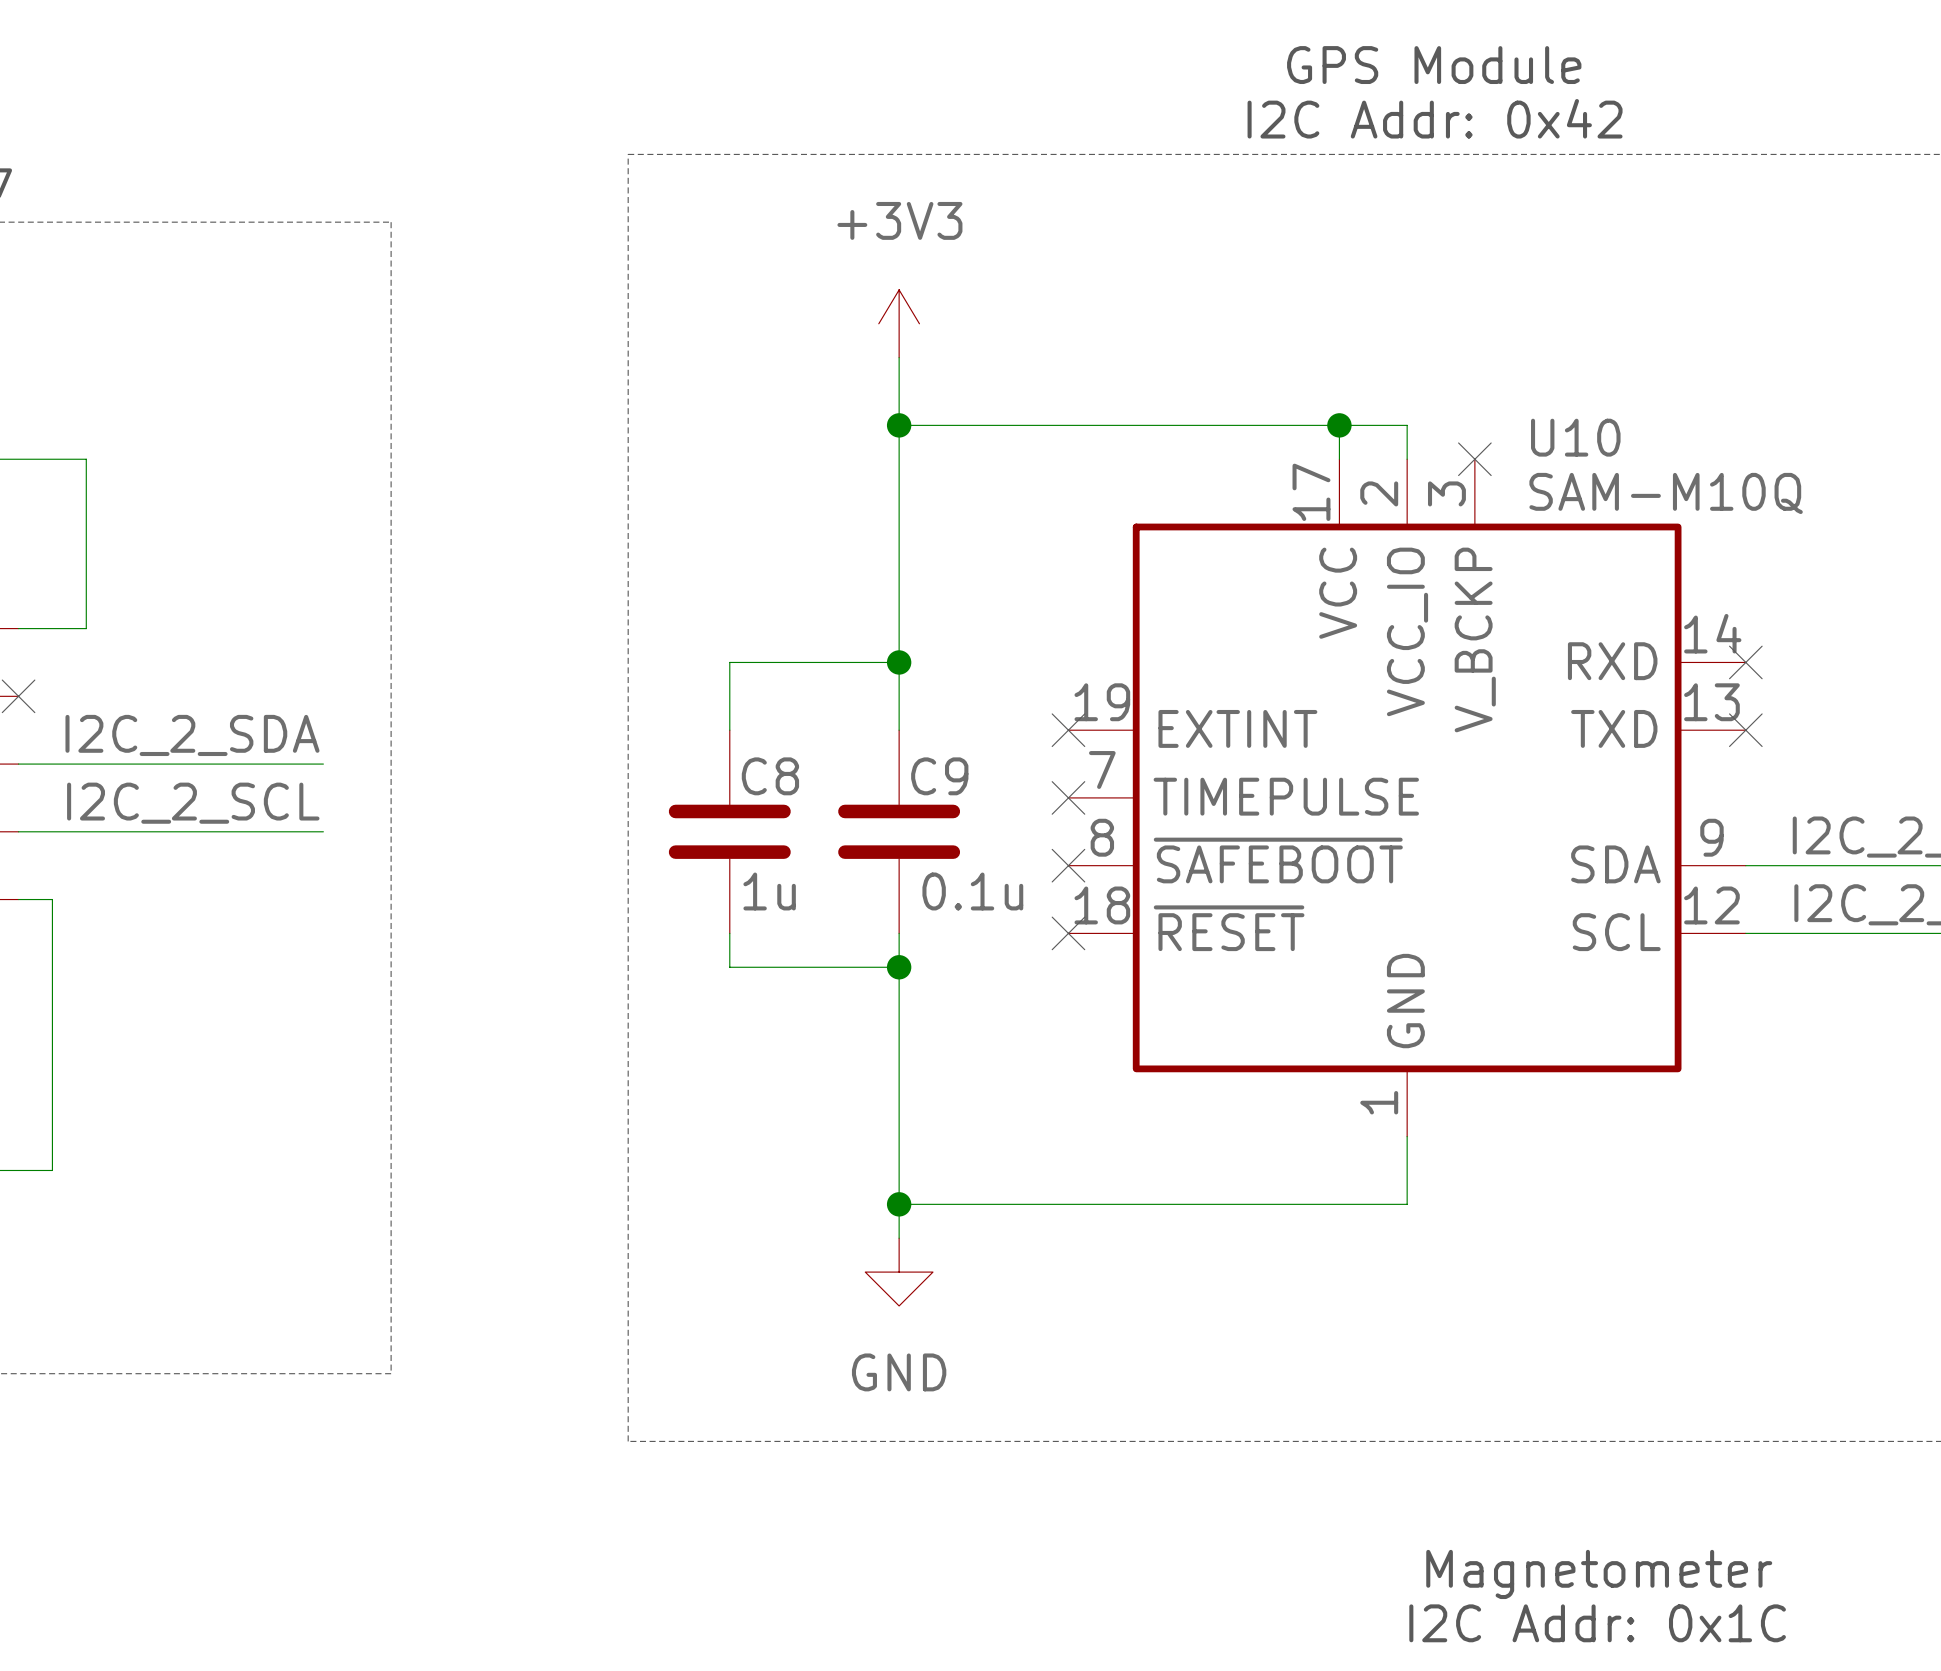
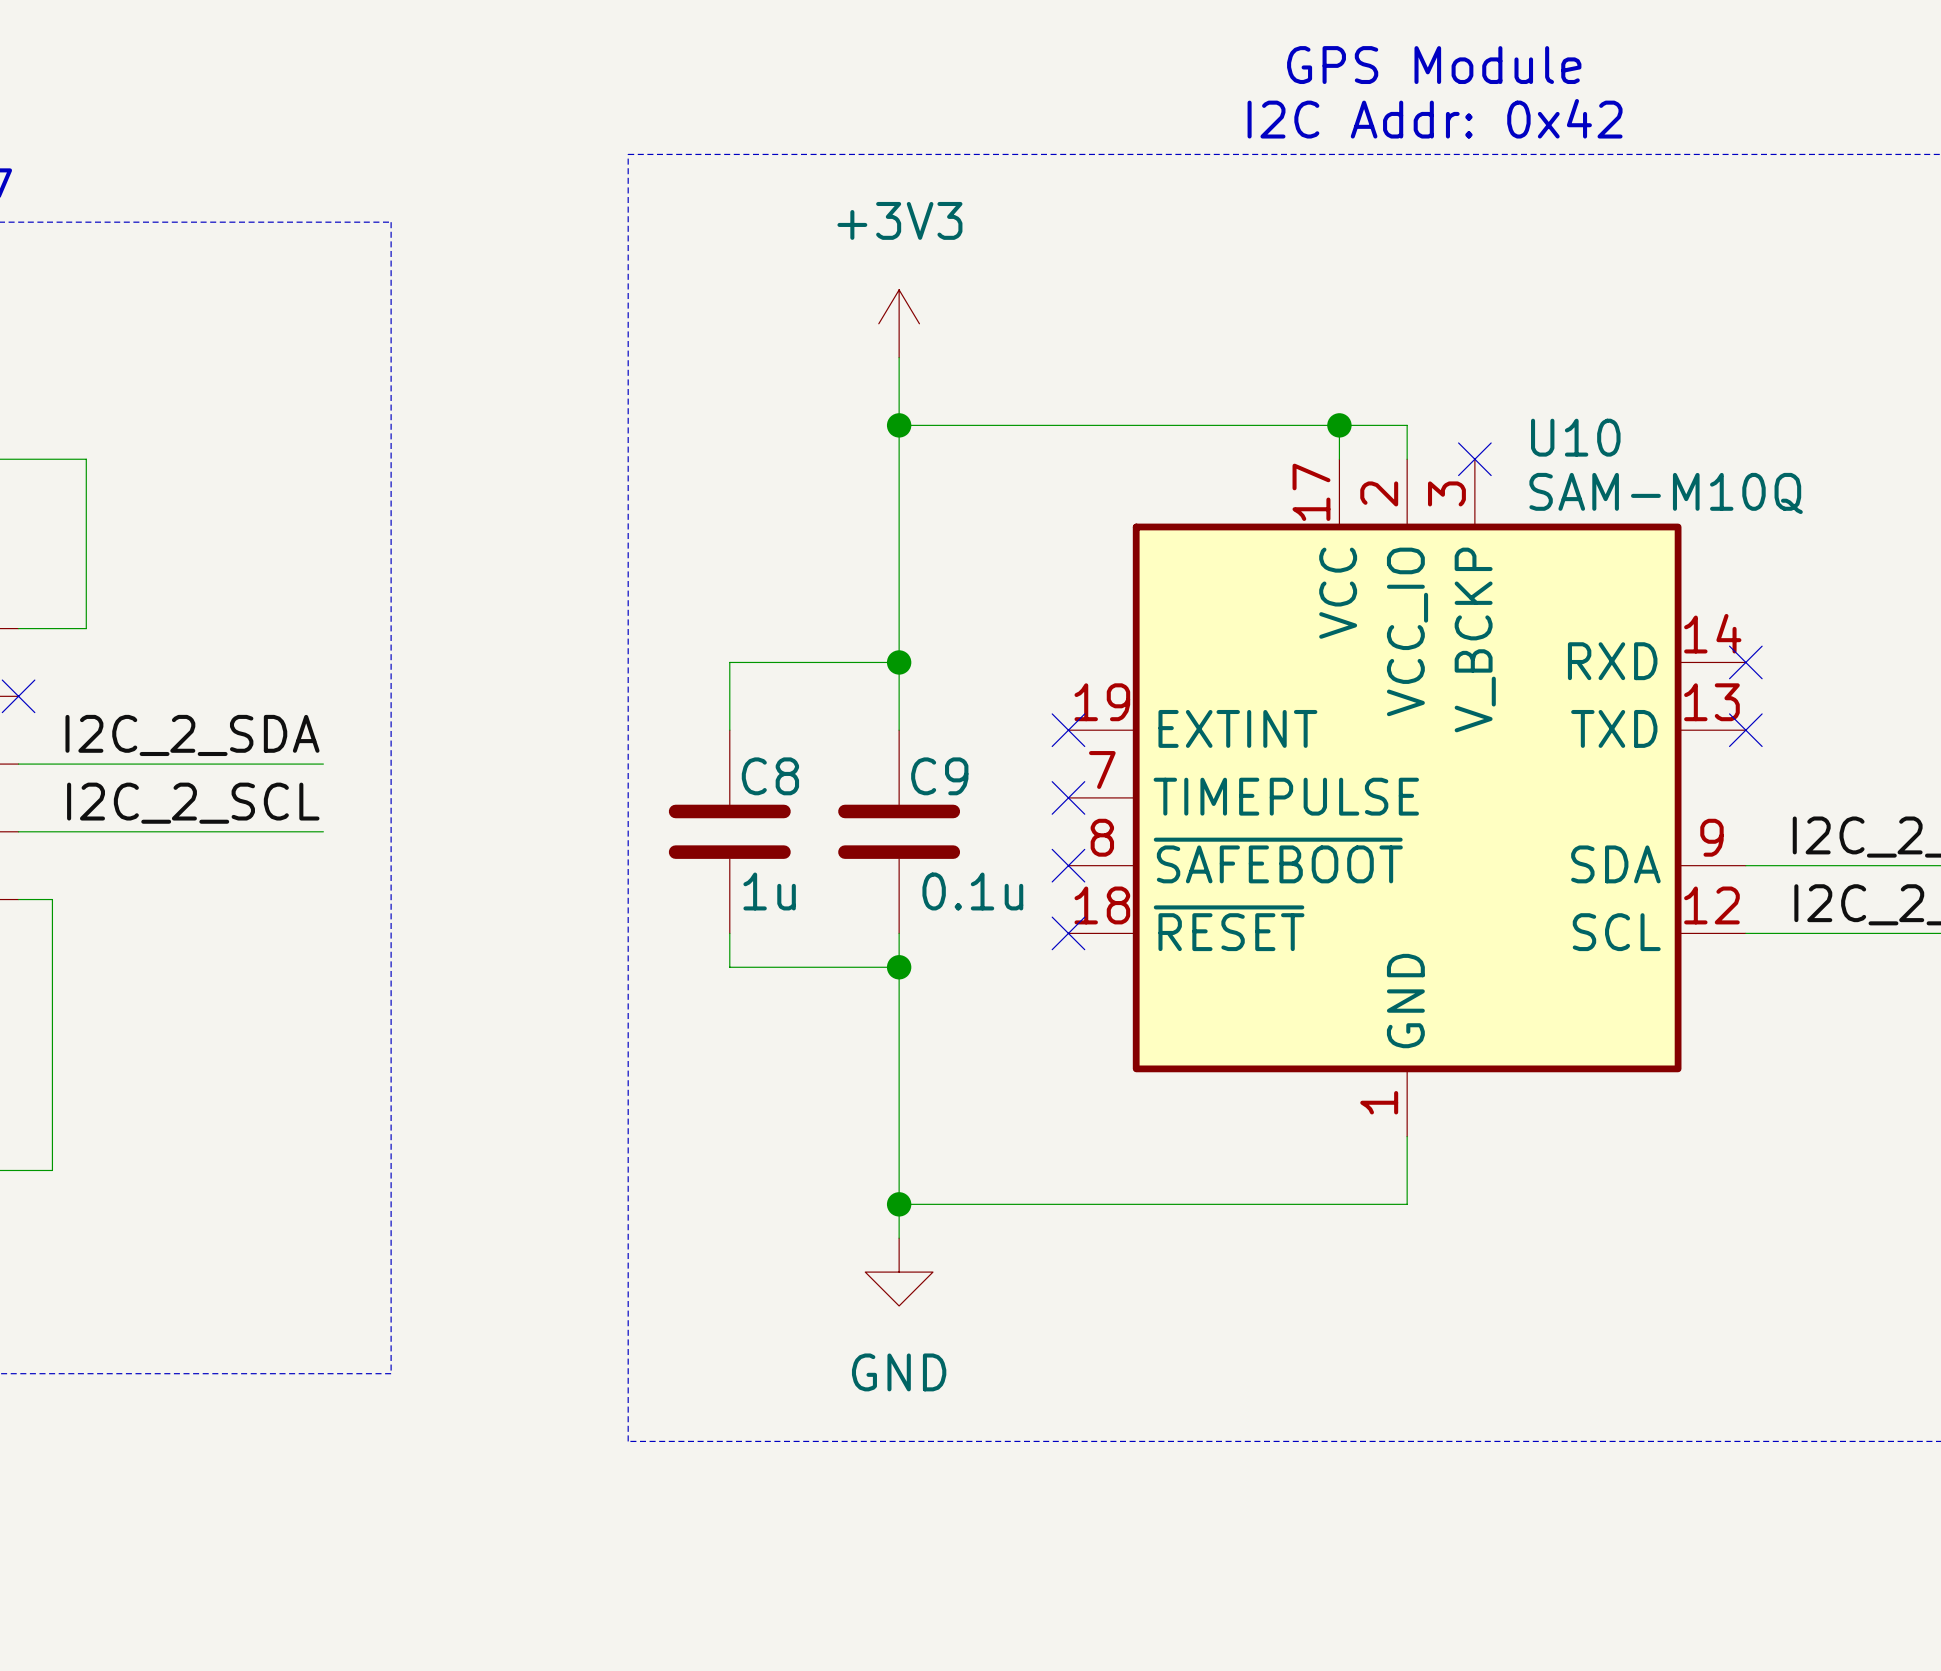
text: Magnetometer (1599, 1574) -> none
text: I2C Addr: 0x1C (1597, 1623) -> none

